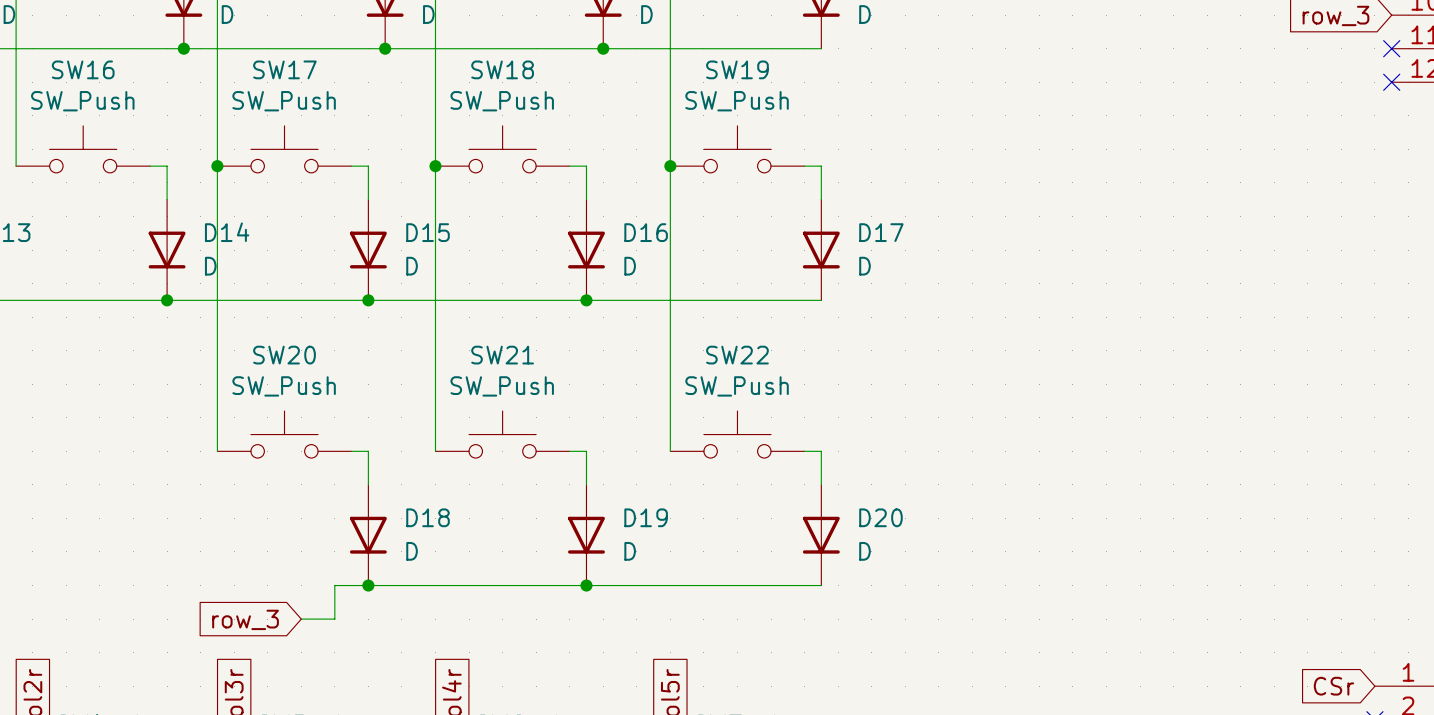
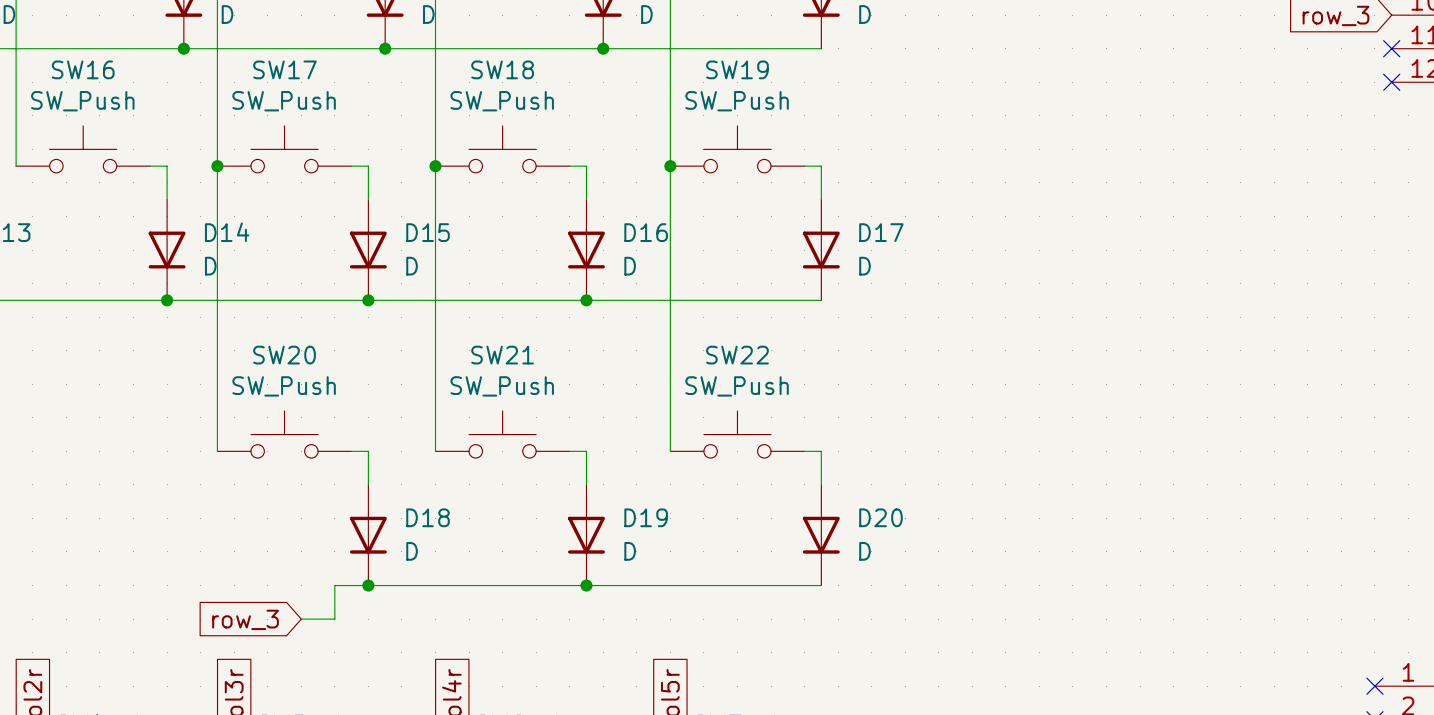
global label: CSr (1333, 686) -> none
no-connect mark: none -> (1374, 686)

